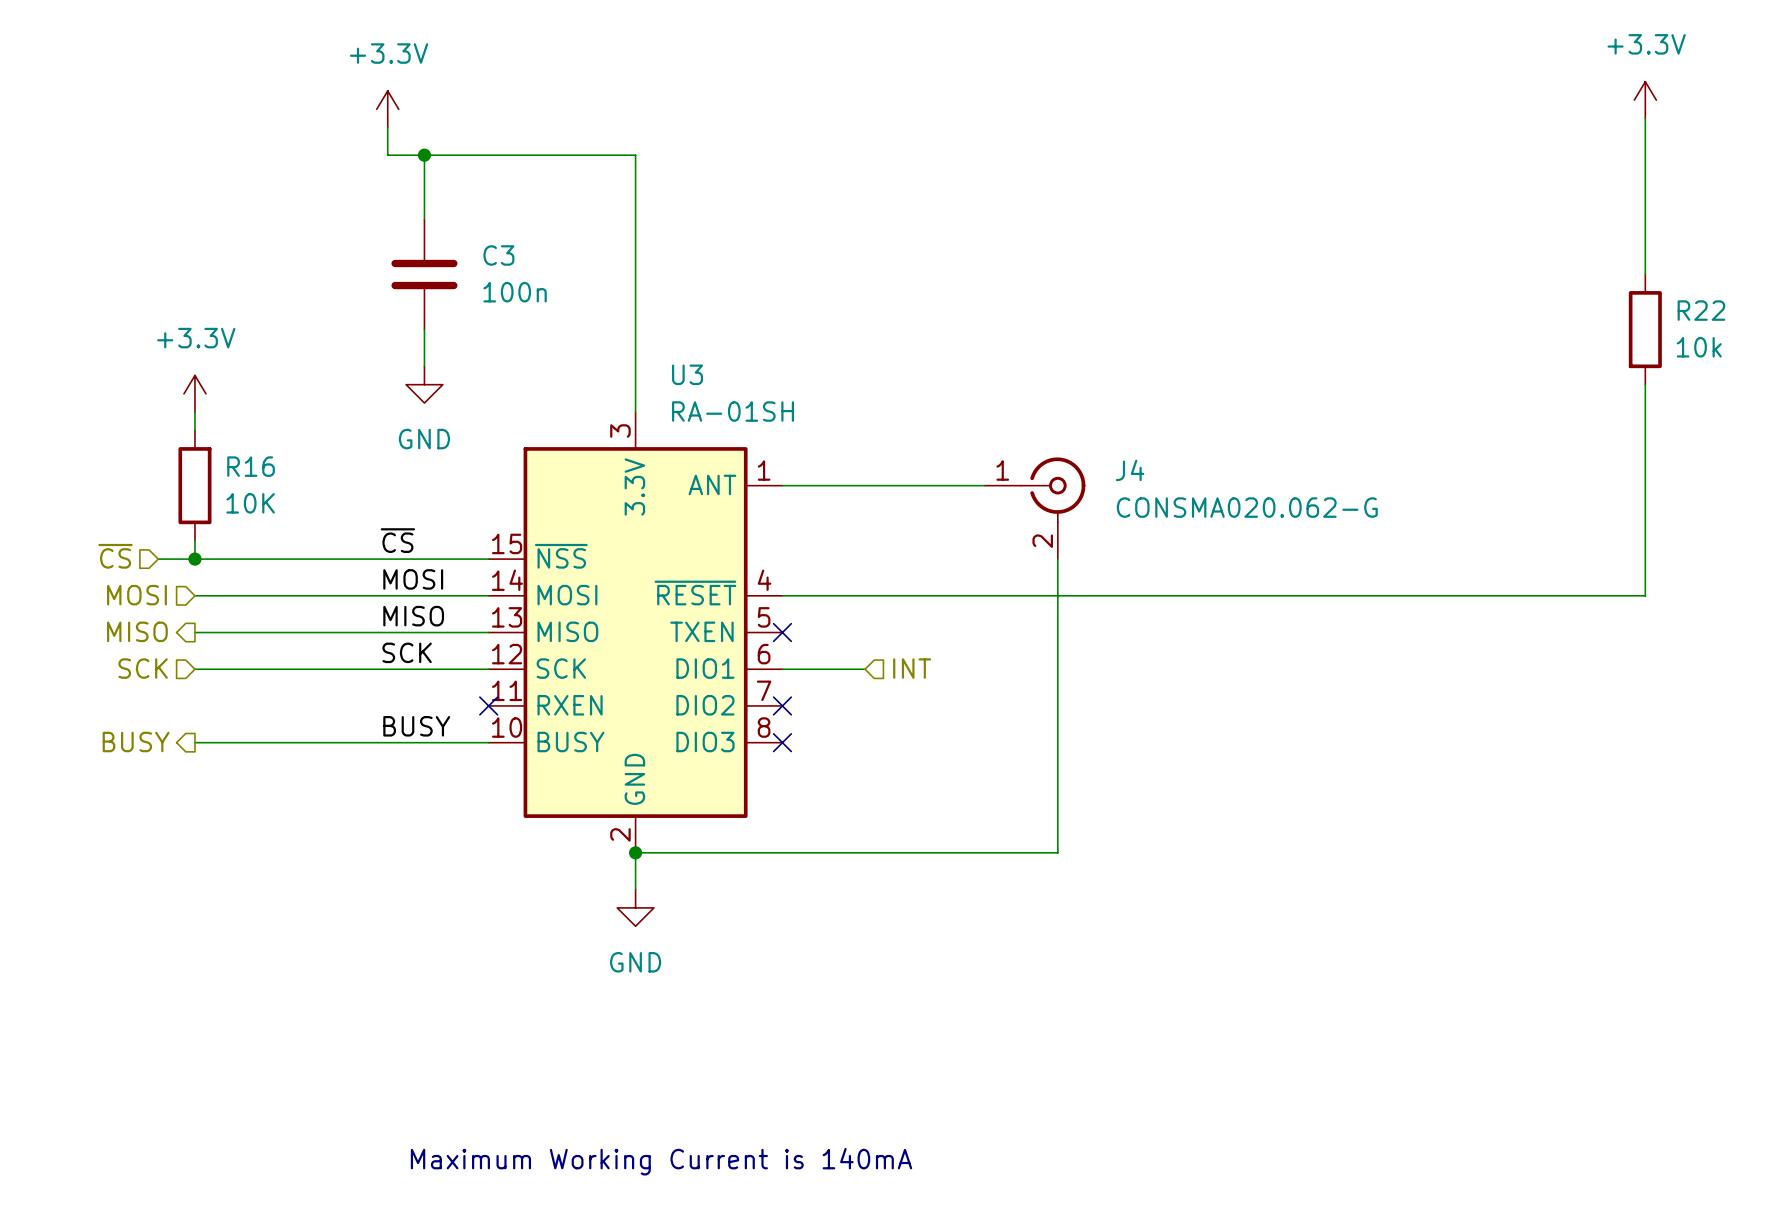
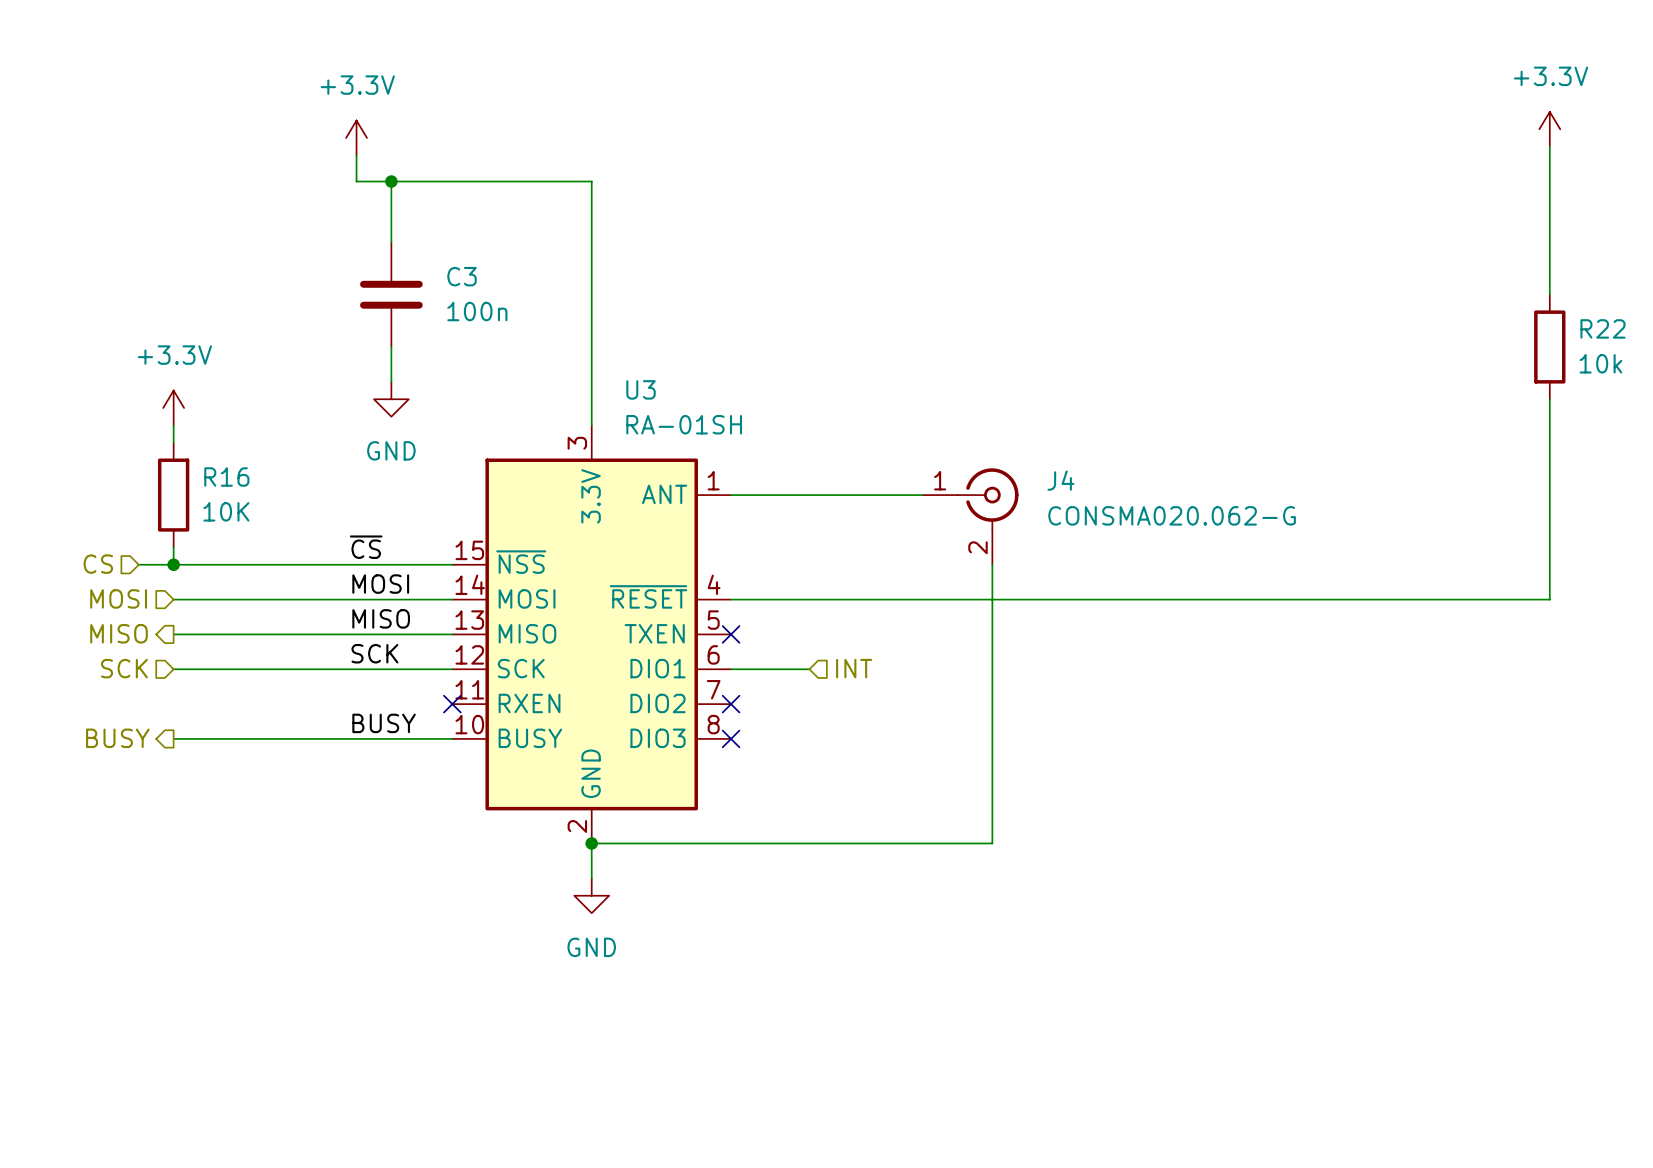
hierarchical label: ~{CS} (115, 556) -> CS (98, 564)
text: Maximum Working Current is 140mA (661, 1161) -> none

